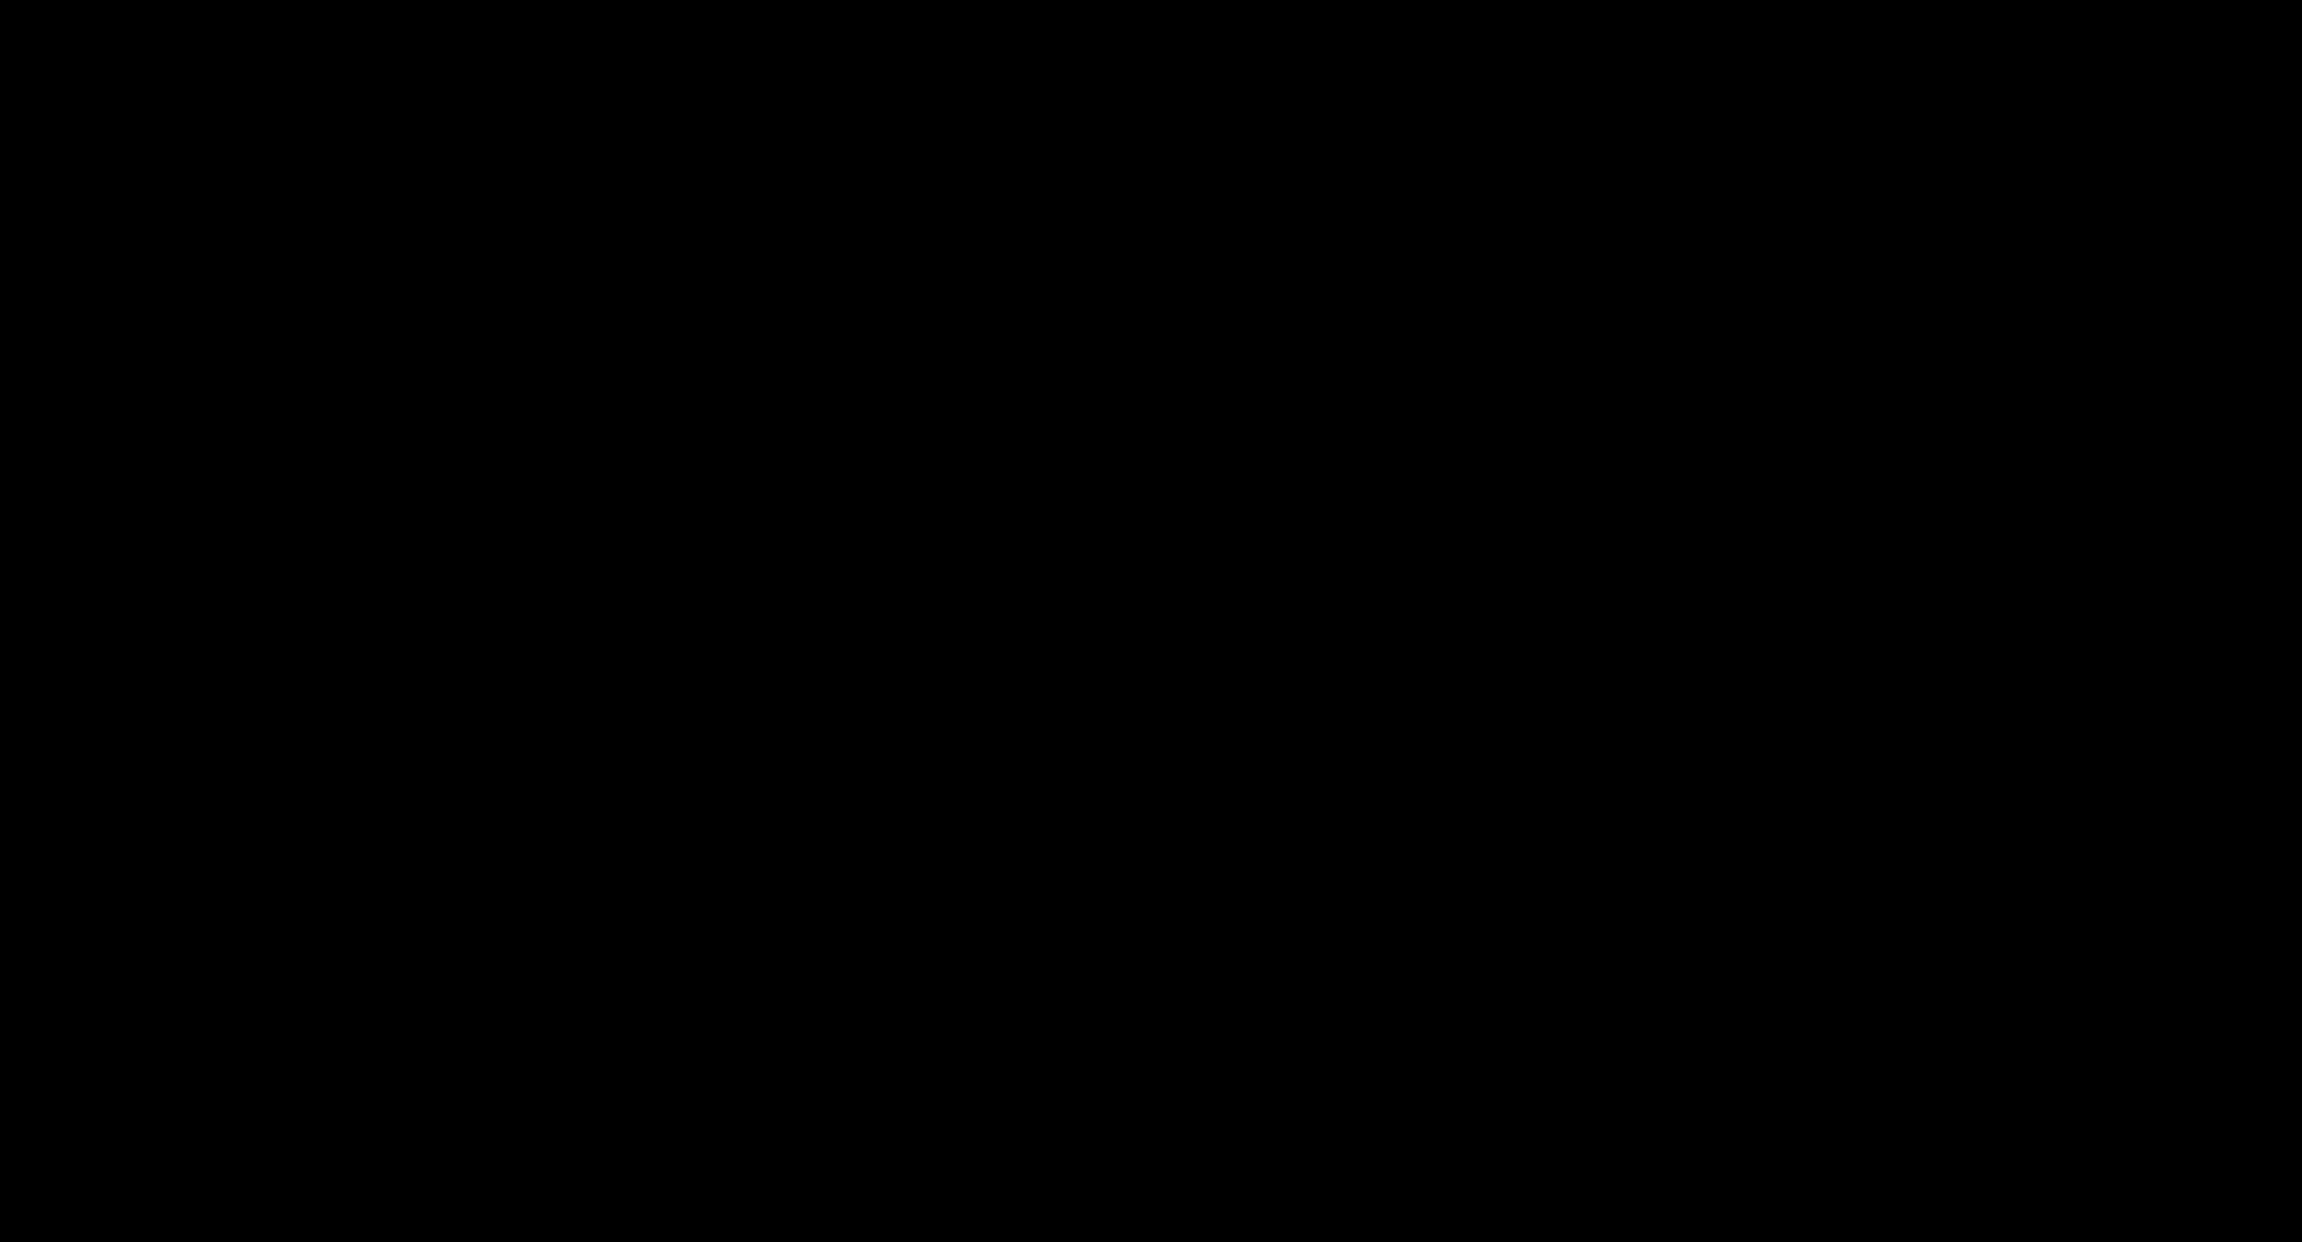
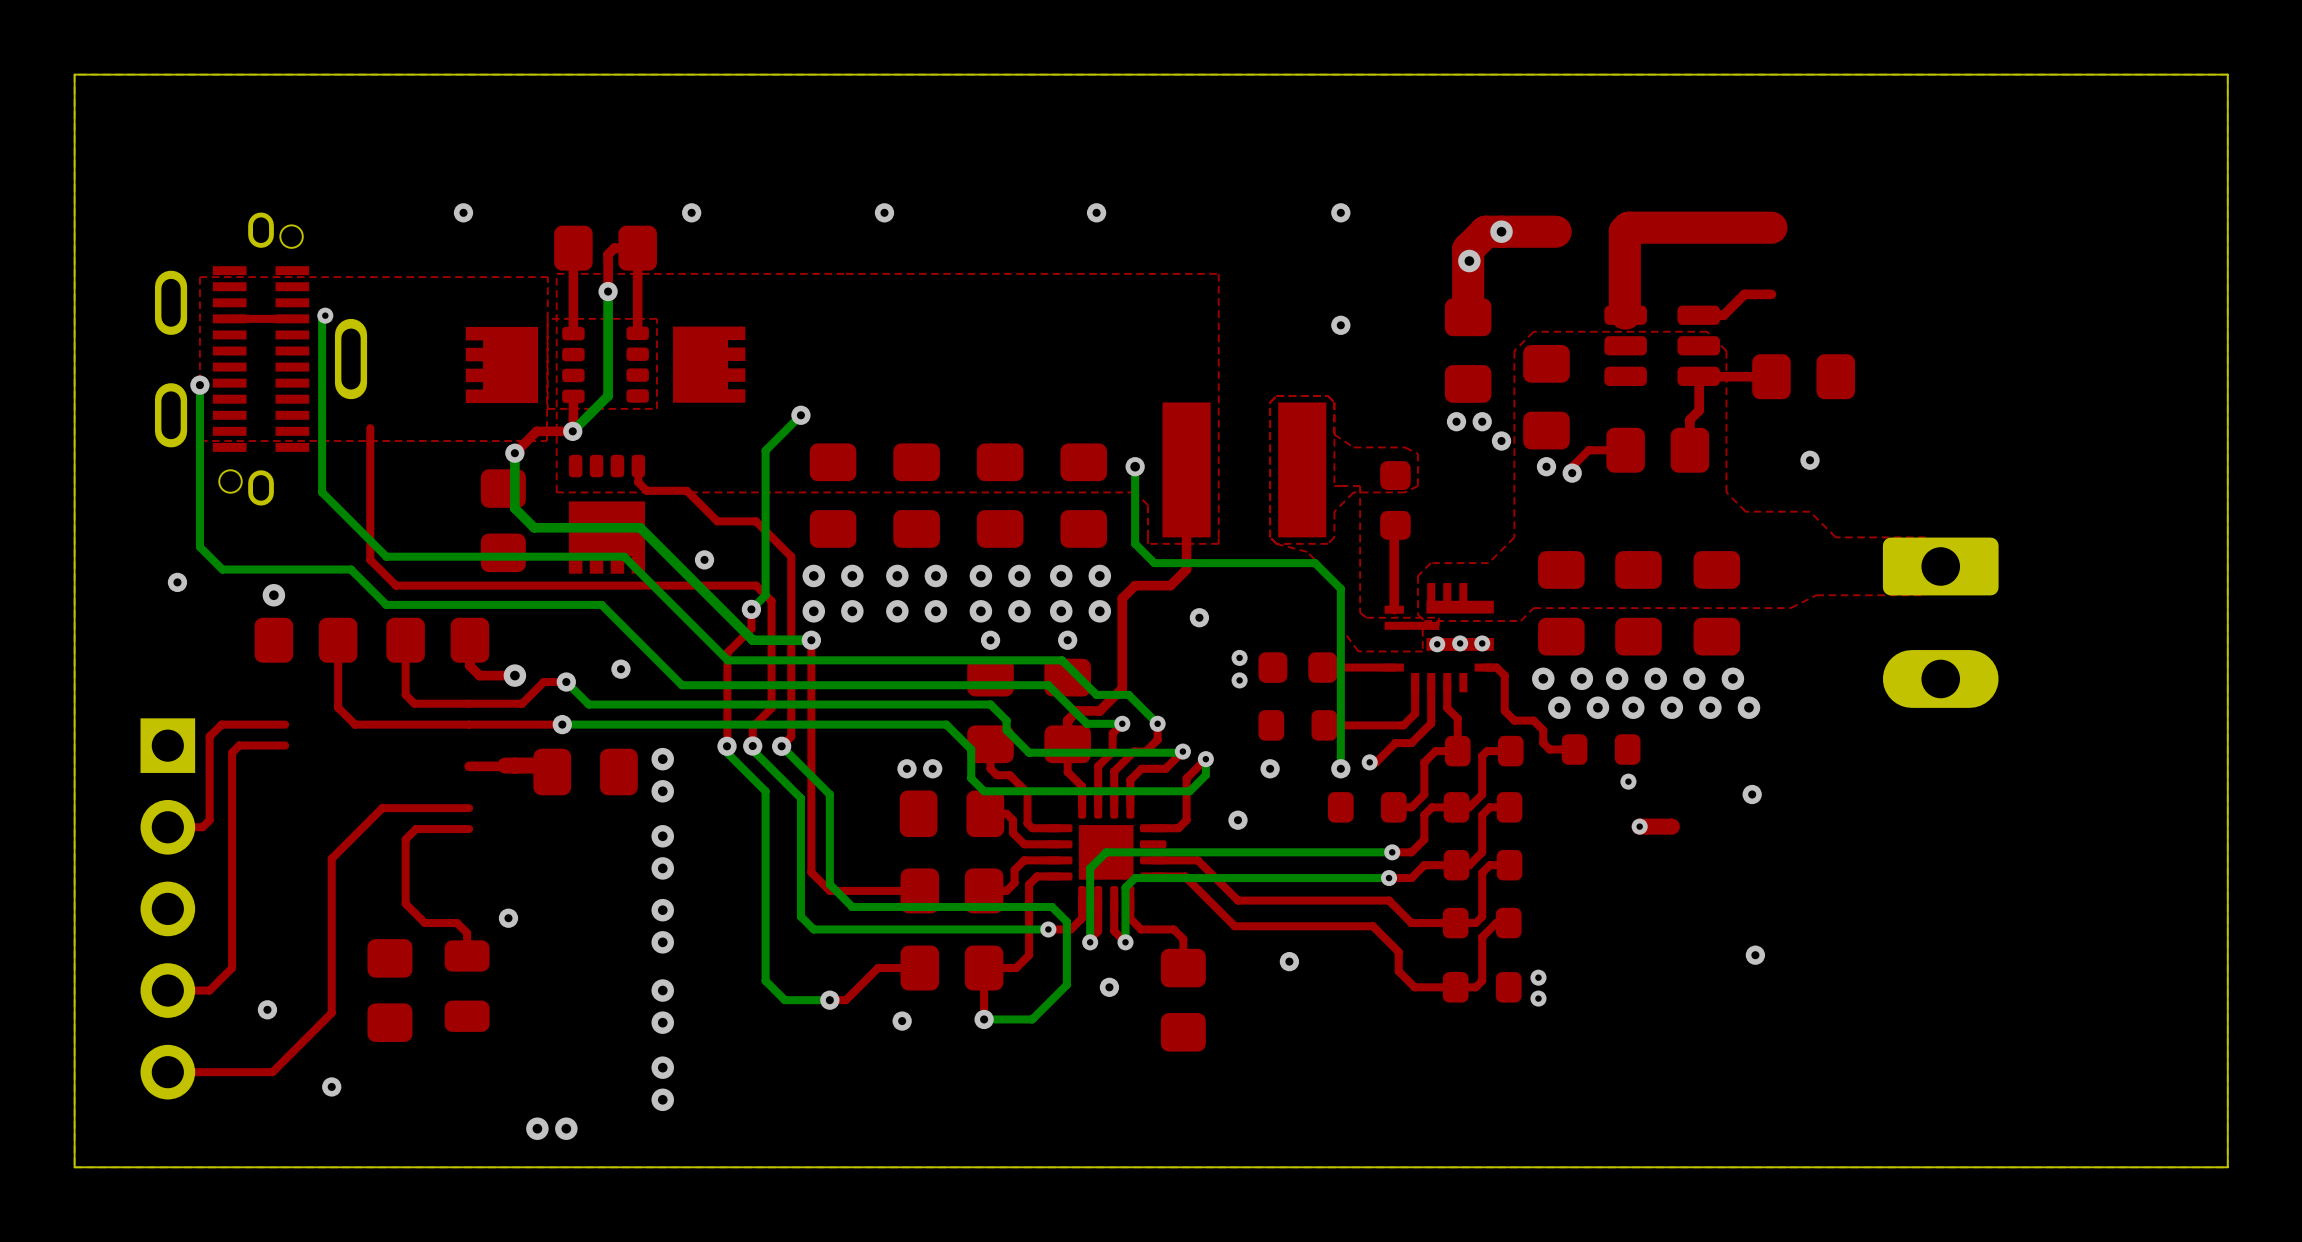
board edge: none -> (2227, 74) (74, 74) (74, 1167) (2227, 1167) (2227, 74)
via: none -> (463, 212)
via: none -> (691, 212)
via: none -> (884, 212)
via: none -> (1096, 212)
via: none -> (1340, 212)
top track: none -> (1771, 227) (1628, 227) (1624, 231) (1625, 313)
via: none -> (1501, 231)
top track: none -> (1555, 231) (1485, 231) (1468, 249) (1468, 317)
top track: none -> (573, 248) (573, 333)
part: none -> (605, 248)
via: none -> (1469, 261)
top zone outline: none -> (1218, 273) (556, 273) (556, 492) (1135, 492) (1148, 505) (1148, 543) (1218, 543) (1218, 273)
top zone outline: none -> (547, 277) (199, 277) (199, 440) (546, 440) (547, 277)
top track: none -> (608, 291) (608, 254) (614, 248) (637, 248) (637, 333)
bottom track: none -> (608, 291) (608, 396) (572, 431)
via: none -> (608, 291)
top track: none -> (1771, 294) (1744, 294) (1723, 315) (1698, 315)
bottom track: none -> (325, 315) (322, 318) (322, 492) (386, 556) (624, 556) (727, 660) (1062, 660) (1096, 694) (1128, 694) (1157, 723)
via: none -> (325, 315)
top track: none -> (292, 318) (229, 318)
top zone outline: none -> (656, 318) (656, 408) (547, 408) (547, 318) (656, 318)
via: none -> (1340, 325)
top zone outline: none -> (1707, 331) (1726, 351) (1726, 492) (1745, 511) (1810, 511) (1835, 537) (1925, 537) (1925, 595) (1816, 595) (1790, 608) (1533, 608) (1520, 620) (1424, 620) (1417, 614) (1417, 575) (1430, 563) (1488, 563) (1514, 537) (1514, 351) (1533, 331) (1707, 331)
part: none -> (1662, 345)
part: none -> (1468, 350)
part: none -> (261, 359)
part: none -> (525, 364)
part: none -> (685, 364)
top track: none -> (1771, 376) (1699, 376) (1699, 410) (1689, 419) (1689, 450)
part: none -> (1803, 376)
bottom track: none -> (199, 385) (199, 547) (222, 569) (351, 569) (386, 604) (601, 604) (682, 685) (1048, 685) (1086, 723) (1122, 723)
via: none -> (199, 385)
top track: none -> (573, 396) (572, 431) (536, 431) (514, 453)
part: none -> (1546, 397)
bottom track: none -> (800, 415) (765, 450) (765, 595) (751, 609)
via: none -> (800, 415)
via: none -> (1456, 421)
via: none -> (1482, 421)
top track: none -> (370, 428) (370, 559) (396, 585) (756, 585) (771, 601) (771, 708) (752, 727) (752, 746)
via: none -> (572, 431)
top zone outline: none -> (1334, 434) (1353, 447) (1405, 447) (1417, 453) (1417, 485) (1405, 492) (1353, 492) (1334, 511) (1334, 537) (1327, 543) (1276, 543)
via: none -> (1501, 440)
top track: none -> (1625, 450) (1588, 450) (1572, 466) (1572, 473)
part: none -> (1657, 450)
bottom track: none -> (514, 453) (514, 508) (534, 527) (640, 527) (752, 640) (811, 640)
via: none -> (514, 453)
via: none -> (1810, 460)
top track: none -> (638, 466) (638, 482) (646, 490) (686, 490) (717, 521) (755, 521) (791, 556) (791, 736) (781, 746)
bottom track: none -> (1135, 466) (1135, 543) (1154, 563) (1315, 563) (1340, 588) (1340, 768)
via: none -> (1135, 466)
via: none -> (1546, 466)
top track: none -> (1186, 469) (1186, 569) (1170, 585) (1135, 585) (1122, 598) (1122, 688) (1099, 710) (1077, 710) (1067, 720) (1067, 772) (1082, 786) (1082, 805)
part: none -> (1244, 469)
via: none -> (1572, 473)
part: none -> (833, 495)
part: none -> (916, 495)
part: none -> (1000, 495)
part: none -> (1083, 495)
part: none -> (1395, 500)
part: none -> (606, 514)
part: none -> (503, 520)
top track: none -> (1395, 525) (1394, 609)
top zone outline: none -> (1276, 543) (1270, 537) (1270, 402) (1276, 396) (1327, 396) (1334, 402) (1334, 485) (1360, 485) (1360, 612) (1366, 617) (1438, 617) (1438, 629) (1422, 629) (1422, 651) (1358, 651) (1339, 625) (1339, 585) (1307, 551) (1276, 543)
via: none -> (704, 559)
via: none -> (813, 575)
via: none -> (852, 575)
via: none -> (897, 575)
via: none -> (935, 575)
via: none -> (980, 575)
via: none -> (1019, 575)
via: none -> (1061, 575)
via: none -> (1099, 575)
via: none -> (177, 582)
via: none -> (273, 595)
part: none -> (1561, 603)
part: none -> (1638, 603)
part: none -> (1716, 603)
top track: none -> (751, 609) (751, 628) (727, 652) (727, 745)
via: none -> (751, 609)
via: none -> (813, 611)
via: none -> (852, 611)
via: none -> (897, 611)
via: none -> (935, 611)
via: none -> (980, 611)
via: none -> (1019, 611)
via: none -> (1061, 611)
via: none -> (1099, 611)
via: none -> (1199, 617)
part: none -> (1940, 622)
part: none -> (1439, 637)
part: none -> (306, 640)
top track: none -> (338, 640) (338, 707) (355, 724) (562, 724)
top track: none -> (405, 640) (405, 694) (414, 703) (522, 703) (543, 682) (566, 682)
part: none -> (437, 640)
top track: none -> (469, 640) (469, 665) (479, 675) (514, 675)
top track: none -> (811, 640) (811, 872) (829, 890) (919, 890)
via: none -> (811, 640)
via: none -> (990, 640)
via: none -> (1067, 640)
via: none -> (1460, 643)
via: none -> (1482, 643)
via: none -> (1437, 644)
via: none -> (1239, 657)
part: none -> (1297, 667)
top track: none -> (1394, 667) (1322, 667)
top track: none -> (1484, 667) (1496, 667) (1504, 675) (1504, 710) (1514, 720) (1533, 720) (1543, 730) (1543, 743) (1549, 749) (1574, 749)
via: none -> (620, 669)
via: none -> (514, 675)
via: none -> (1543, 678)
via: none -> (1581, 678)
via: none -> (1617, 678)
via: none -> (1655, 678)
via: none -> (1694, 678)
via: none -> (1732, 678)
via: none -> (1239, 680)
bottom track: none -> (566, 682) (588, 704) (990, 704) (1006, 720) (1006, 730) (1029, 752) (1182, 751)
via: none -> (566, 682)
top track: none -> (1415, 682) (1415, 713) (1403, 725) (1324, 725)
top track: none -> (1431, 682) (1431, 723) (1411, 743) (1395, 743) (1376, 762) (1369, 762)
top track: none -> (1447, 682) (1447, 708) (1457, 718) (1457, 751) (1435, 751) (1424, 762) (1424, 794) (1411, 807) (1393, 807)
via: none -> (1559, 707)
via: none -> (1597, 707)
via: none -> (1633, 707)
via: none -> (1671, 707)
via: none -> (1710, 707)
via: none -> (1748, 707)
part: none -> (990, 710)
part: none -> (1067, 710)
top track: none -> (1122, 723) (1112, 733) (1112, 751) (1098, 766) (1098, 805)
via: none -> (1122, 723)
top track: none -> (1157, 723) (1157, 739) (1146, 751) (1134, 751) (1114, 771) (1114, 805)
via: none -> (1157, 723)
top track: none -> (285, 724) (221, 724) (209, 736) (209, 820) (202, 827) (167, 827)
bottom track: none -> (562, 724) (946, 724) (971, 749) (971, 778) (984, 791) (1189, 791) (1205, 775) (1205, 759)
via: none -> (562, 724)
part: none -> (1297, 725)
top track: none -> (990, 744) (990, 768) (996, 775) (1009, 775) (1027, 792) (1027, 823) (1032, 828) (1059, 828)
top track: none -> (285, 745) (239, 745) (232, 752) (232, 968) (209, 990) (167, 990)
bottom track: none -> (727, 746) (727, 752) (765, 791) (765, 980) (784, 1000) (829, 1000)
via: none -> (727, 746)
bottom track: none -> (752, 746) (755, 749) (755, 753) (800, 798) (800, 916) (813, 929) (1048, 929)
via: none -> (752, 746)
bottom track: none -> (781, 746) (829, 794) (829, 884) (852, 906) (1052, 906) (1066, 921) (1066, 984) (1032, 1019) (984, 1019)
via: none -> (781, 746)
part: none -> (1601, 749)
top track: none -> (1182, 751) (1165, 768) (1141, 768) (1130, 780) (1130, 805)
via: none -> (1182, 751)
part: none -> (1484, 751)
top track: none -> (1510, 751) (1487, 751) (1482, 755) (1482, 794) (1469, 807) (1432, 807) (1424, 815) (1424, 839) (1411, 852) (1389, 852)
via: none -> (662, 759)
top track: none -> (1205, 759) (1186, 778) (1186, 820) (1178, 828) (1153, 828)
via: none -> (1205, 759)
via: none -> (1369, 762)
top track: none -> (550, 765) (469, 766)
via: none -> (906, 768)
via: none -> (932, 768)
via: none -> (1270, 768)
via: none -> (1340, 768)
part: none -> (585, 772)
via: none -> (1628, 781)
via: none -> (662, 791)
via: none -> (1752, 794)
part: none -> (1367, 807)
part: none -> (1483, 807)
top track: none -> (1509, 807) (1489, 807) (1482, 815) (1482, 852) (1469, 865) (1424, 865) (1411, 878) (1389, 878)
top track: none -> (469, 808) (382, 808) (331, 858) (331, 1013) (272, 1072) (167, 1072)
part: none -> (951, 813)
top track: none -> (985, 813) (1006, 813) (1013, 820) (1013, 833) (1024, 844) (1059, 844)
via: none -> (1237, 820)
via: none -> (1639, 826)
part: none -> (1655, 826)
top track: none -> (469, 829) (416, 829) (405, 839) (405, 903) (424, 923) (457, 923) (467, 933) (467, 955)
via: none -> (662, 836)
part: none -> (1106, 852)
bottom track: none -> (1389, 852) (1106, 852) (1090, 868) (1090, 942)
via: none -> (1392, 852)
top track: none -> (1059, 860) (1024, 860) (1014, 870) (1014, 882) (1006, 890) (984, 890)
top track: none -> (1153, 860) (1197, 860) (1237, 900) (1389, 900) (1411, 923) (1475, 923) (1482, 916) (1482, 872) (1489, 865) (1509, 865)
part: none -> (1483, 865)
via: none -> (662, 868)
top track: none -> (1059, 876) (1037, 876) (1029, 884) (1029, 955) (1016, 968) (984, 968) (984, 1019)
top track: none -> (1153, 876) (1184, 876) (1234, 926) (1372, 926) (1398, 951) (1398, 971) (1414, 987) (1475, 987) (1482, 980) (1482, 937) (1496, 923) (1508, 923)
bottom track: none -> (1389, 878) (1135, 878) (1125, 887) (1125, 942)
via: none -> (1389, 878)
part: none -> (951, 890)
top track: none -> (1082, 899) (1082, 918) (1070, 929) (1048, 929)
top track: none -> (1098, 899) (1098, 931) (1090, 939)
top track: none -> (1114, 899) (1114, 931) (1125, 942)
top track: none -> (1130, 899) (1130, 918) (1141, 929) (1173, 929) (1183, 939) (1183, 968)
part: none -> (167, 908)
via: none -> (662, 910)
via: none -> (508, 918)
part: none -> (1482, 923)
via: none -> (1048, 929)
via: none -> (662, 942)
via: none -> (1090, 942)
via: none -> (1125, 942)
via: none -> (1755, 955)
via: none -> (1289, 961)
top track: none -> (919, 968) (878, 968) (845, 1000) (829, 1000)
part: none -> (951, 968)
via: none -> (1538, 977)
part: none -> (467, 986)
via: none -> (1109, 987)
part: none -> (1482, 987)
part: none -> (389, 990)
via: none -> (662, 990)
via: none -> (1538, 998)
via: none -> (829, 1000)
part: none -> (1183, 1000)
via: none -> (267, 1009)
via: none -> (984, 1019)
via: none -> (902, 1021)
via: none -> (662, 1022)
via: none -> (662, 1067)
via: none -> (331, 1086)
via: none -> (662, 1099)
via: none -> (537, 1128)
via: none -> (566, 1128)

